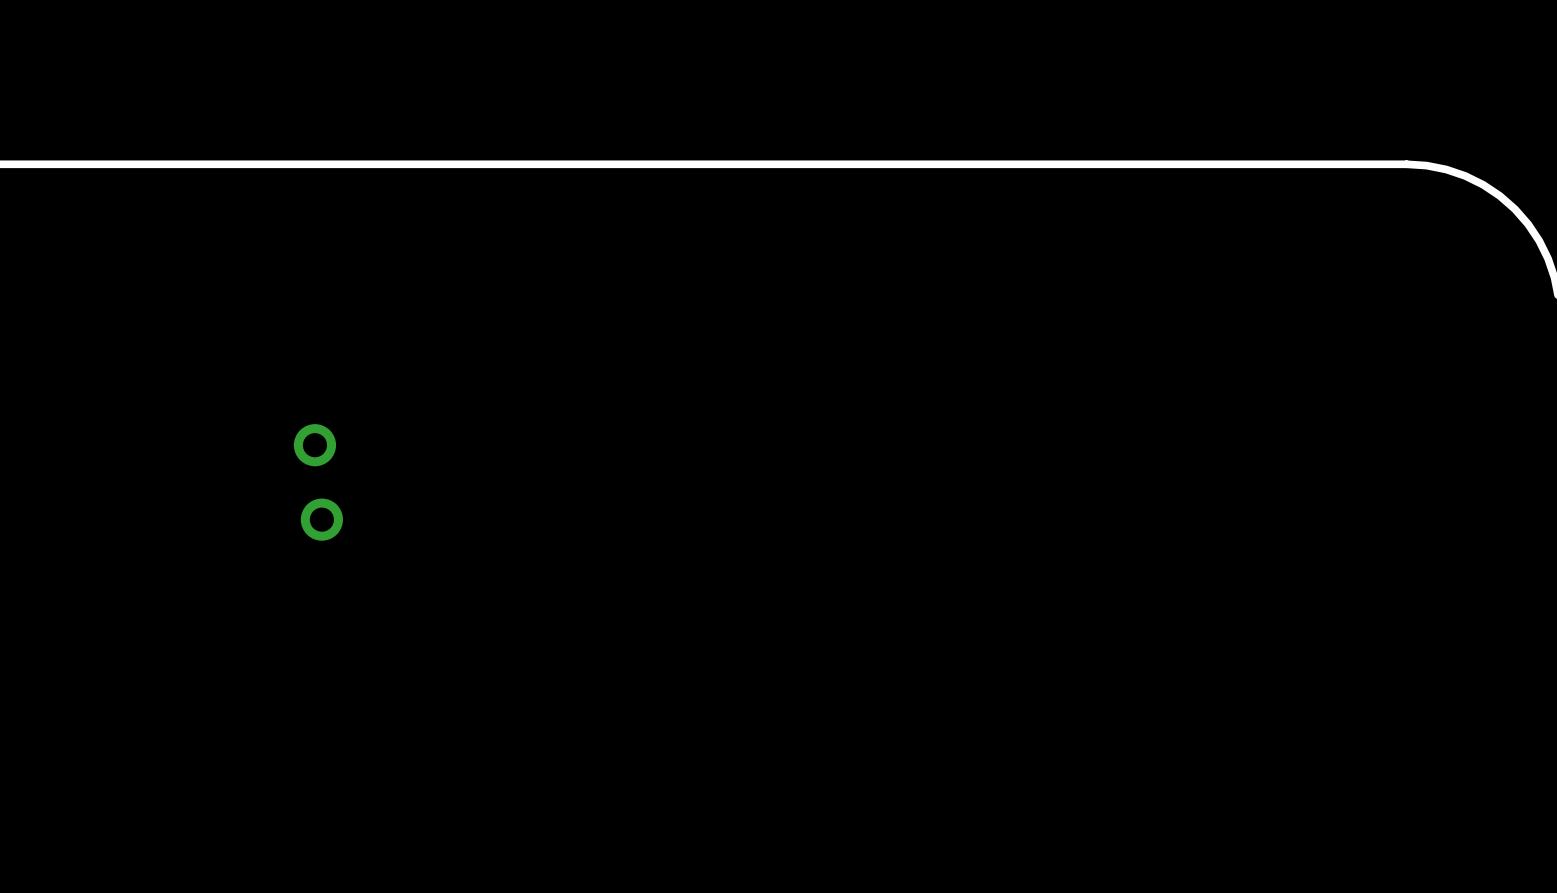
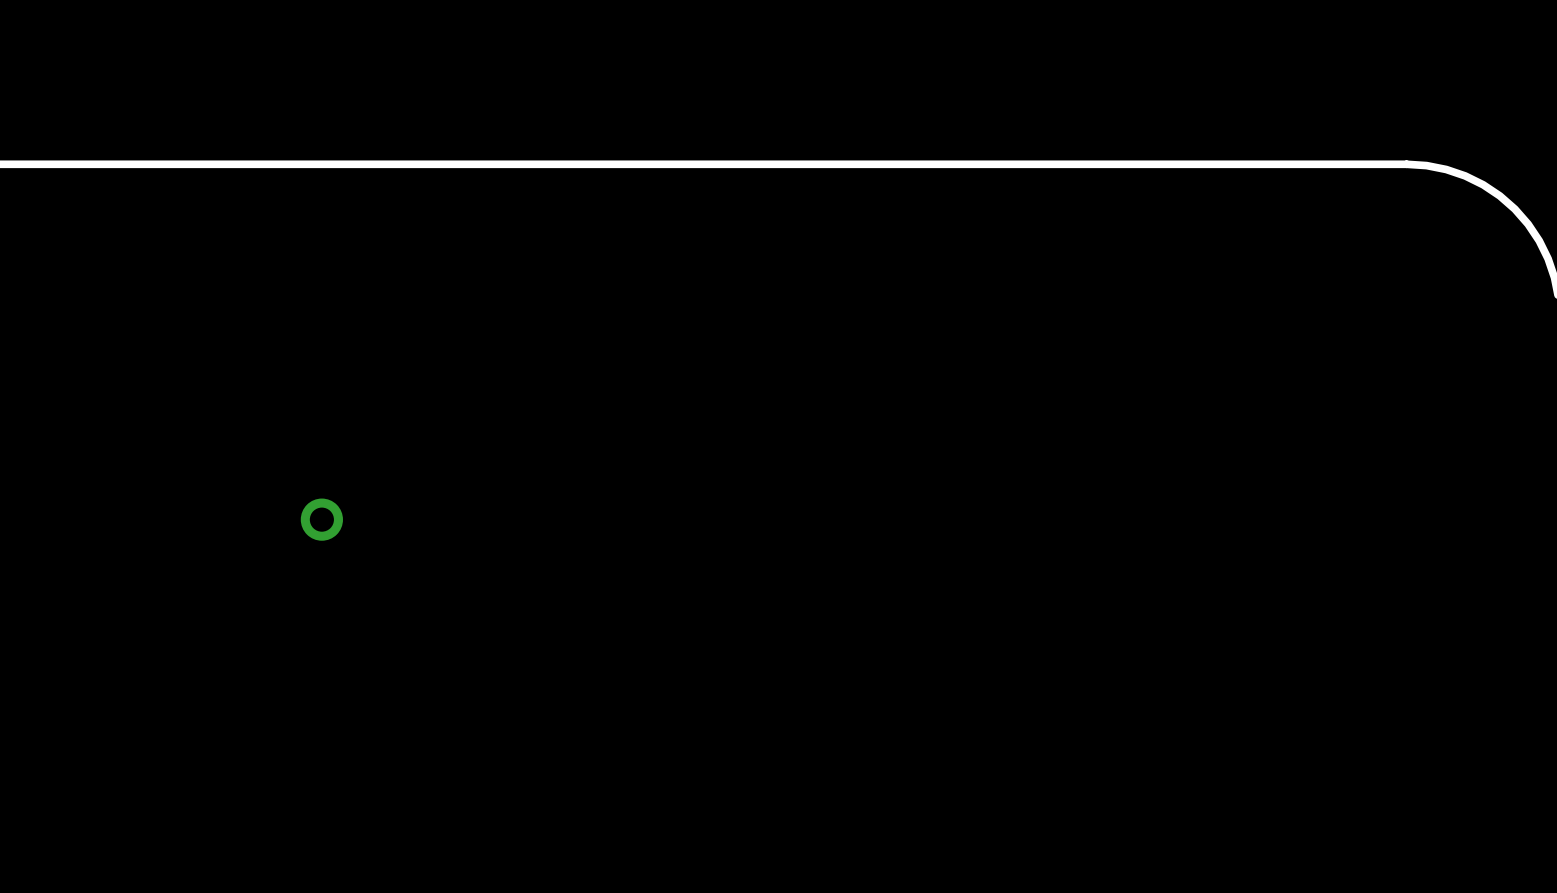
via: (314, 445) -> none

